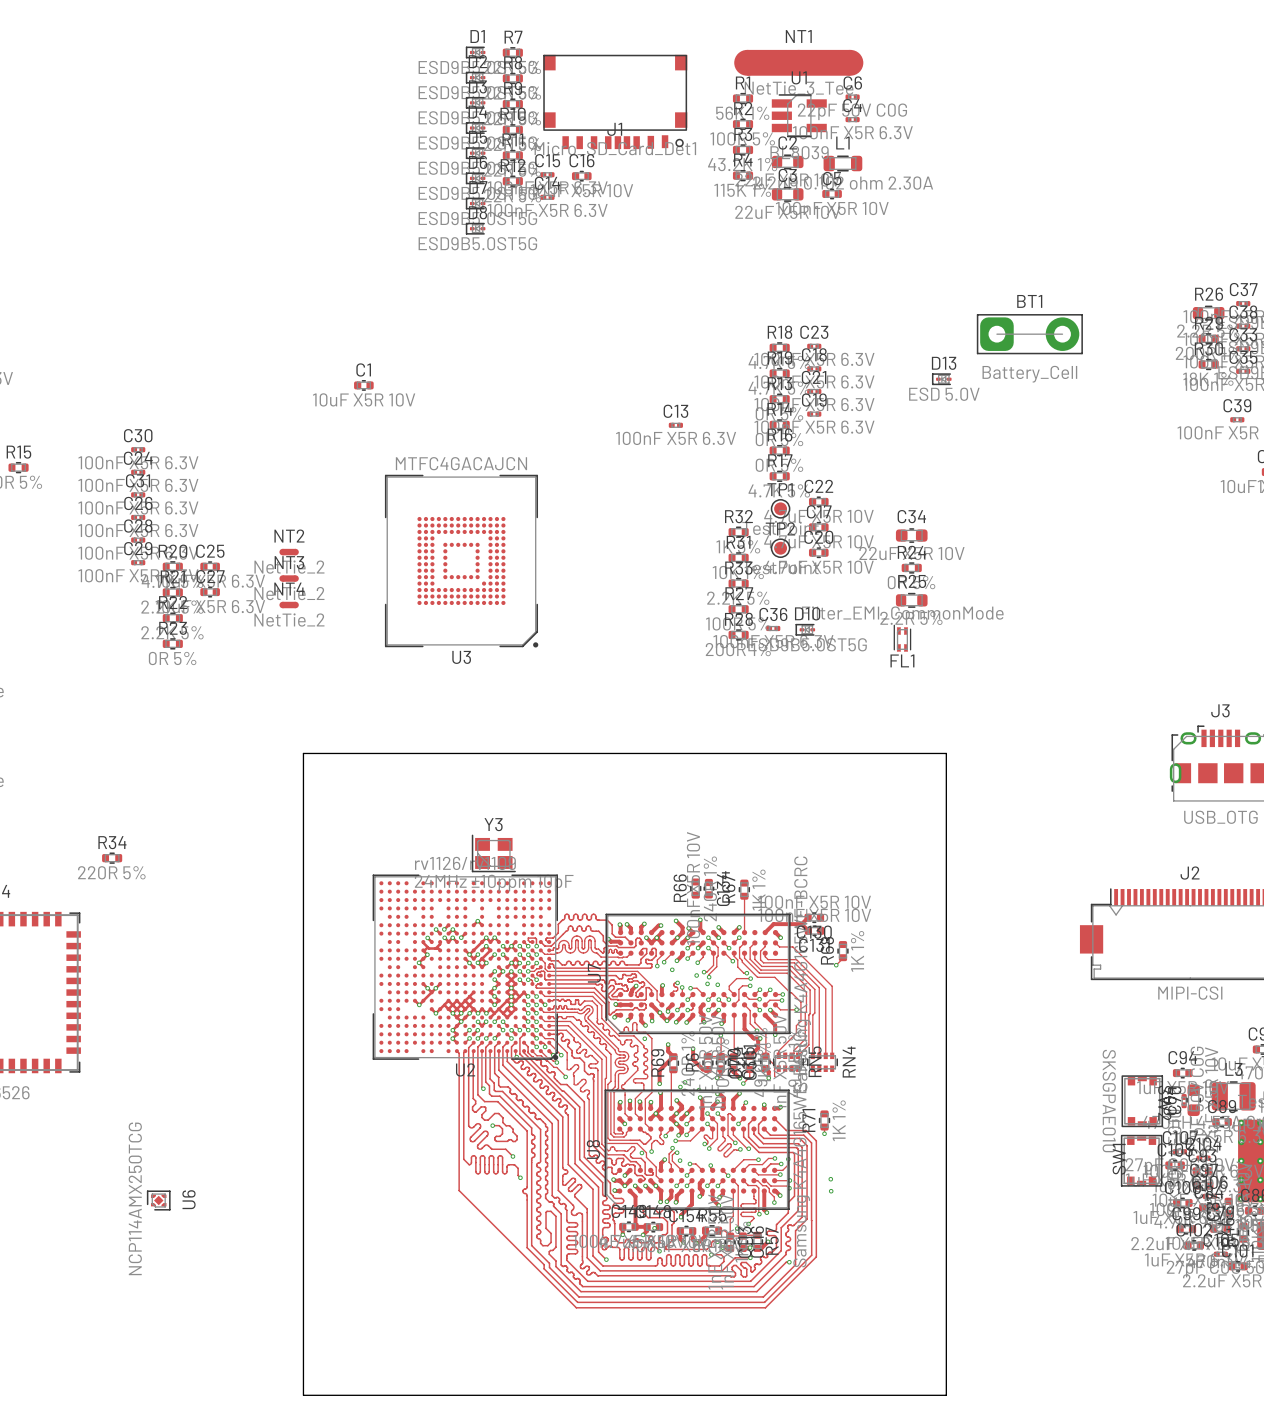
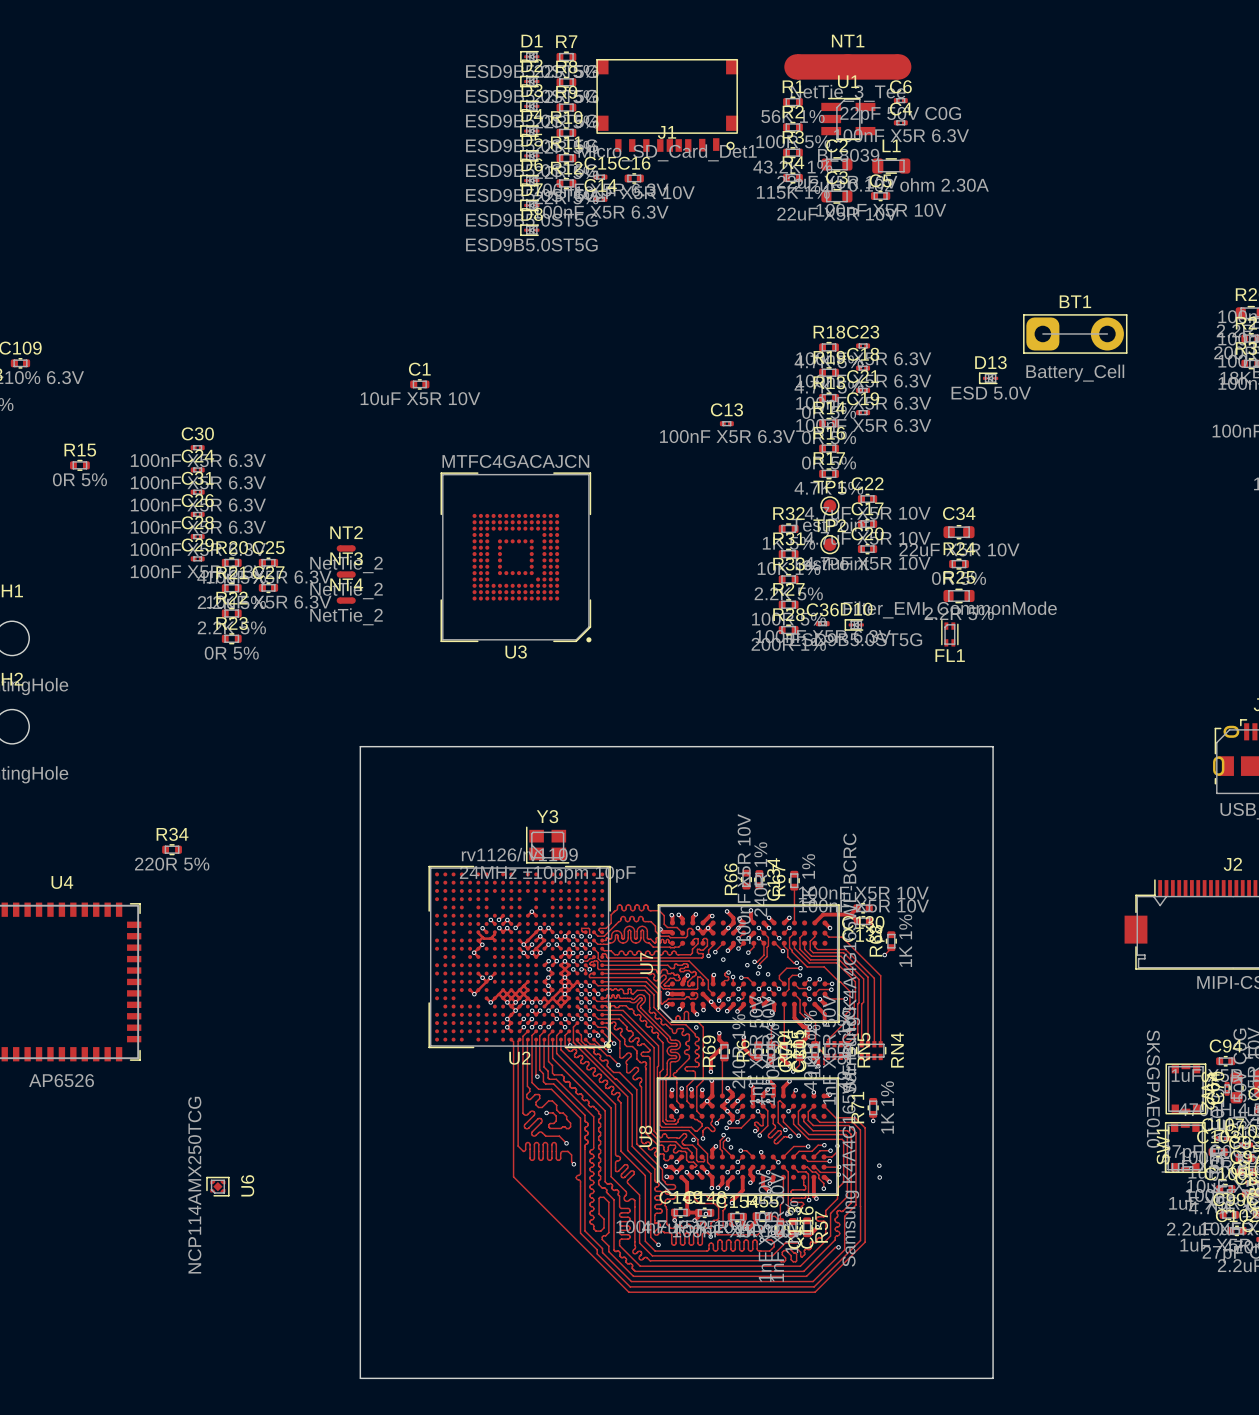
via: (685, 1082) -> none
via: (680, 1087) -> none

